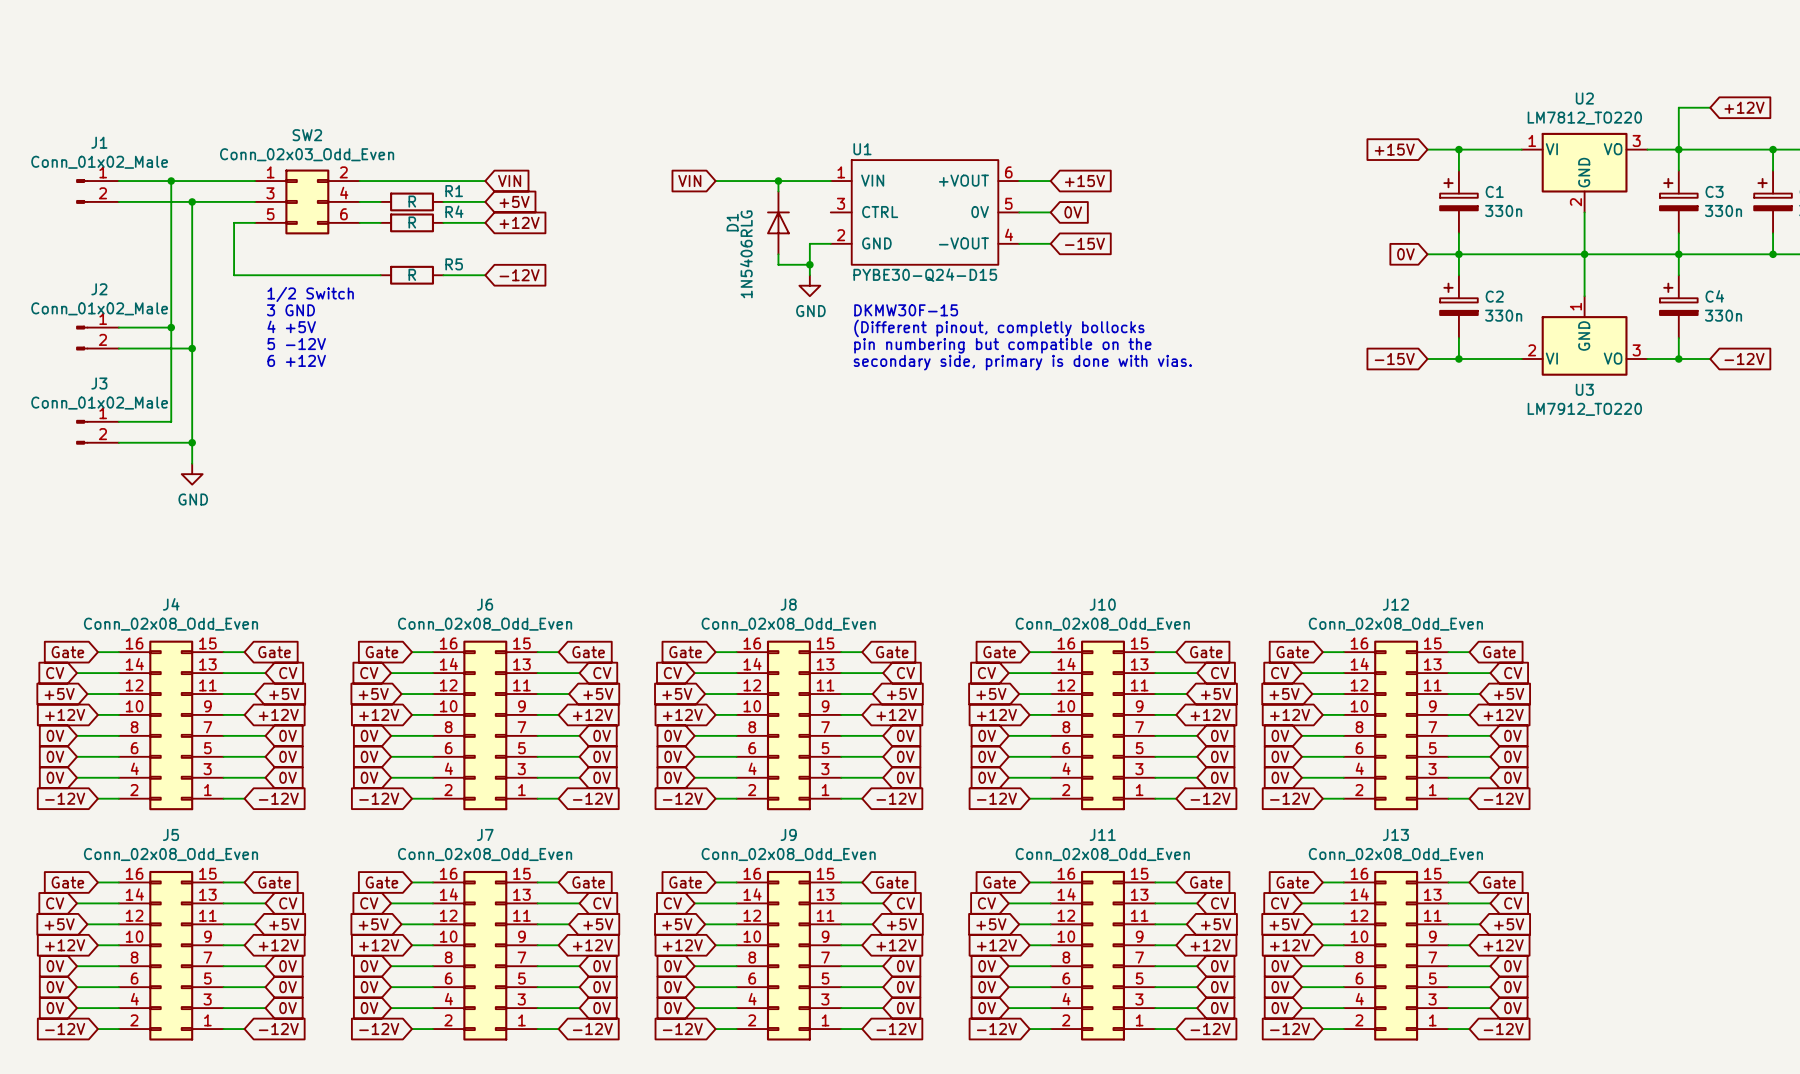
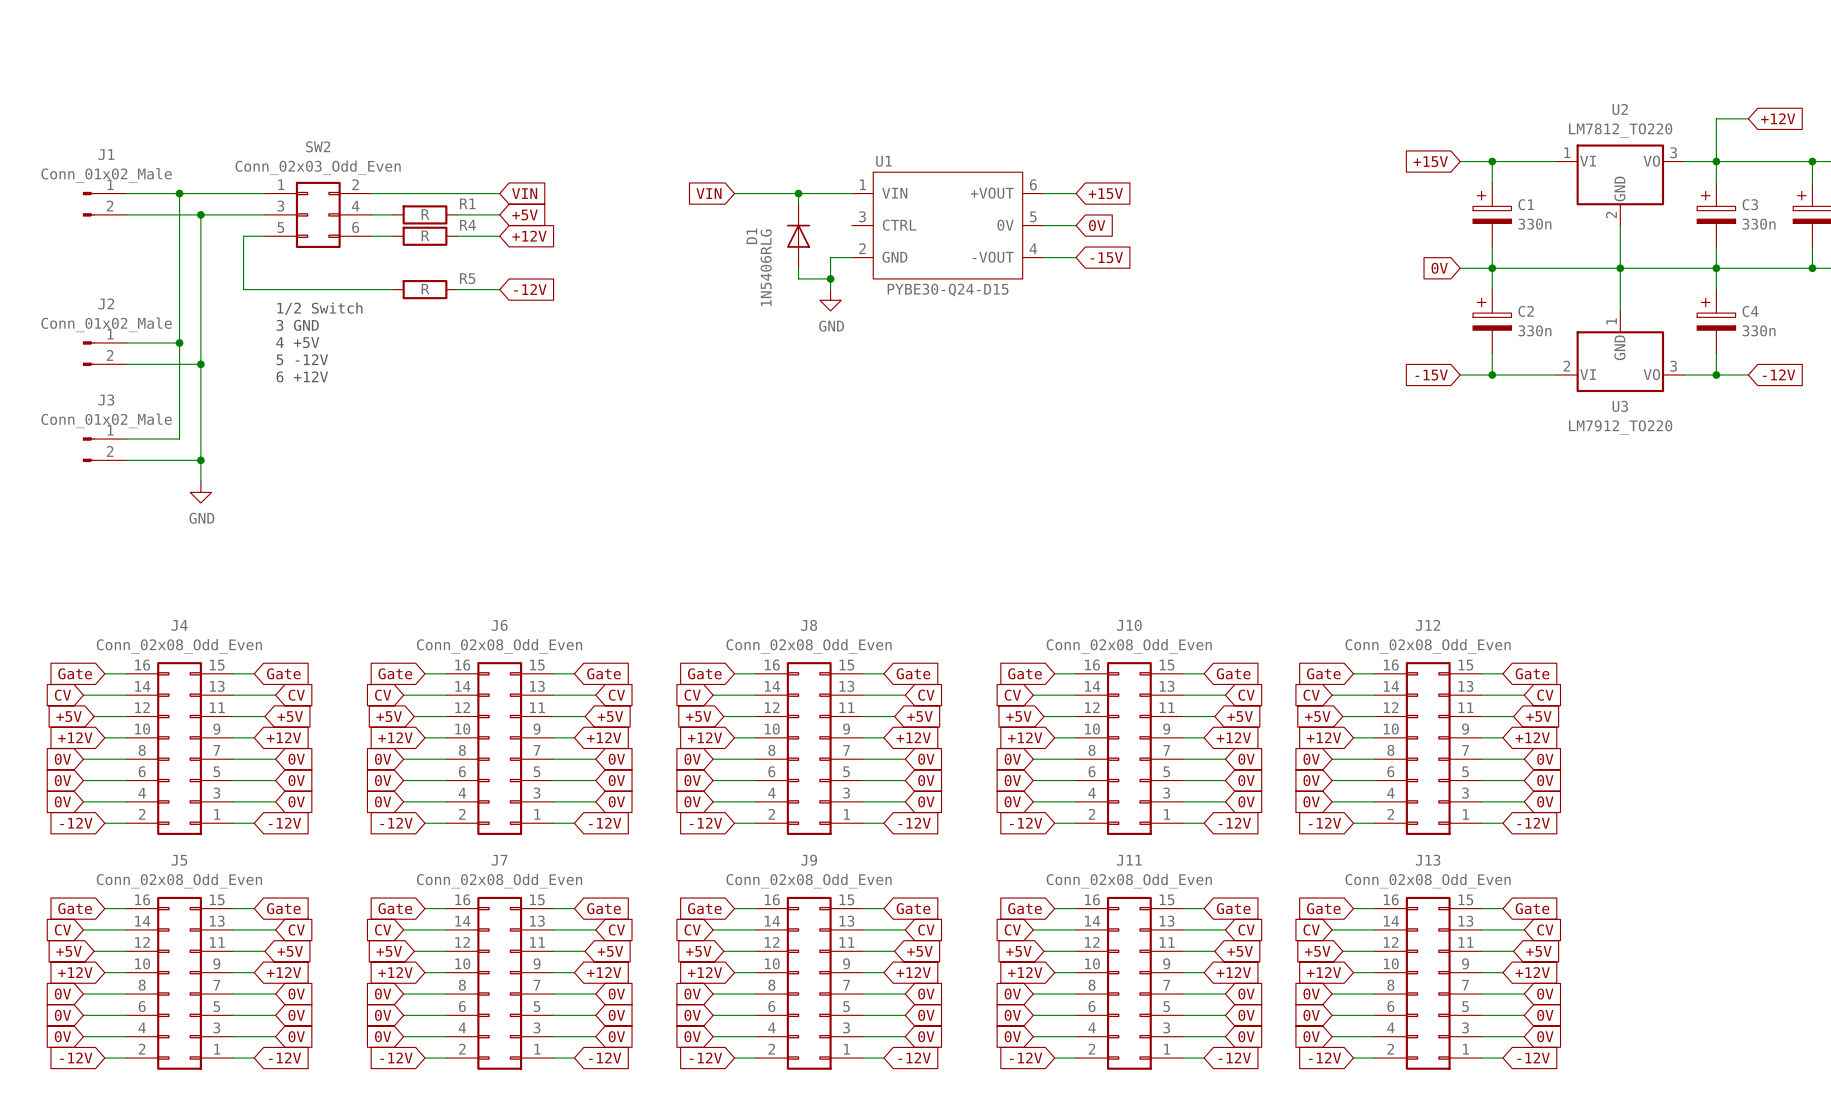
text: DKMW30F-15 (906, 310) -> none
text: (Different pinout, completly bollocks (999, 328) -> none
text: pin numbering but compatible on the (1002, 345) -> none
text: secondary side, primary is done with vias. (1022, 362) -> none

